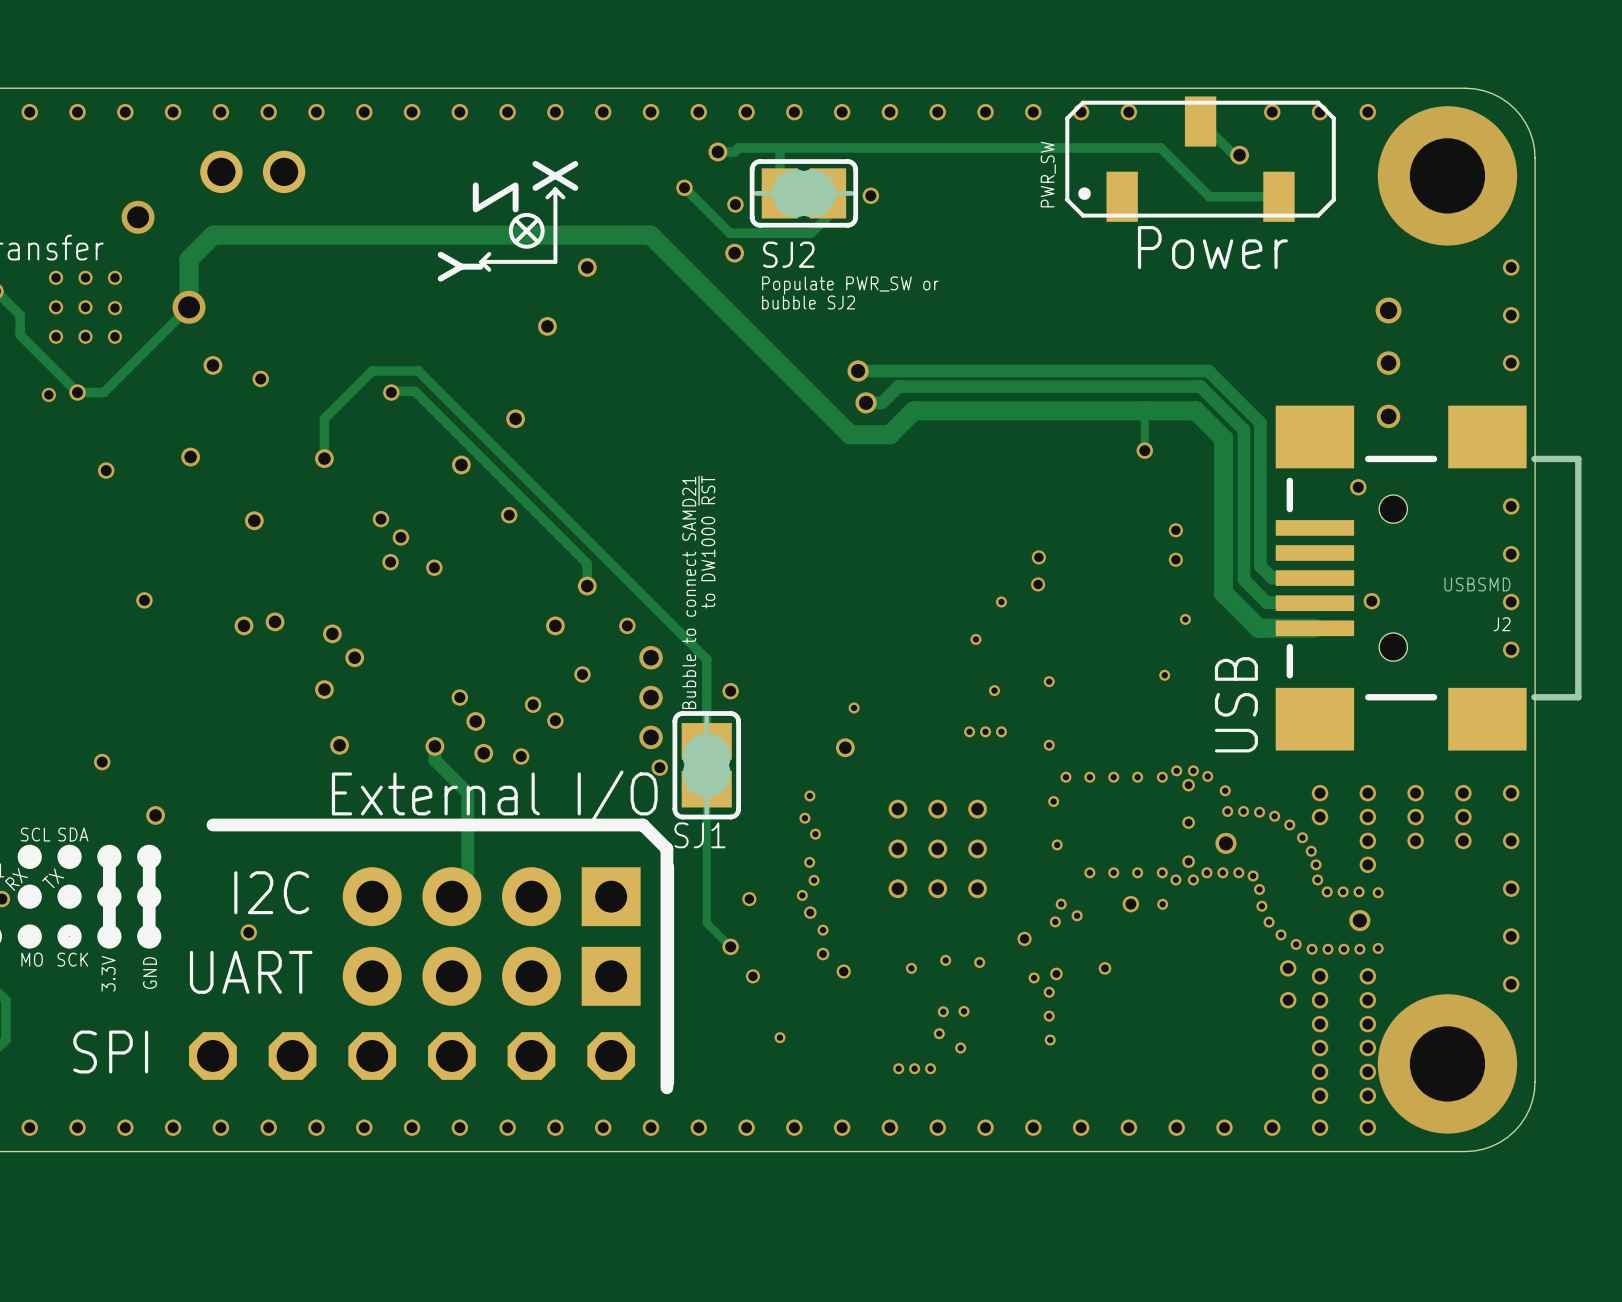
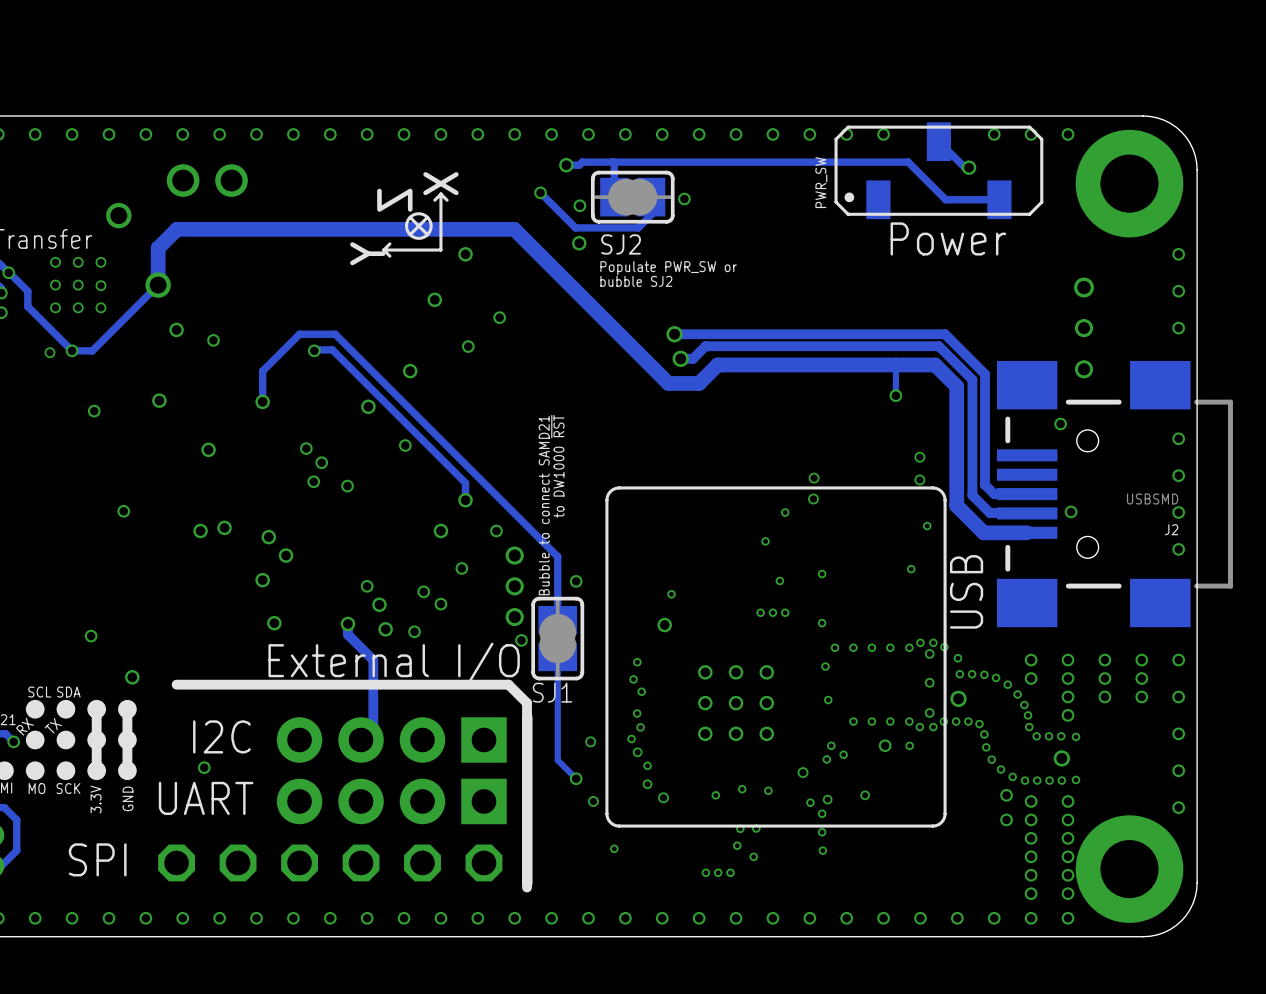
via: none -> (499, 317)
via: none -> (468, 346)
drawing: none -> [605, 486, 947, 828]

